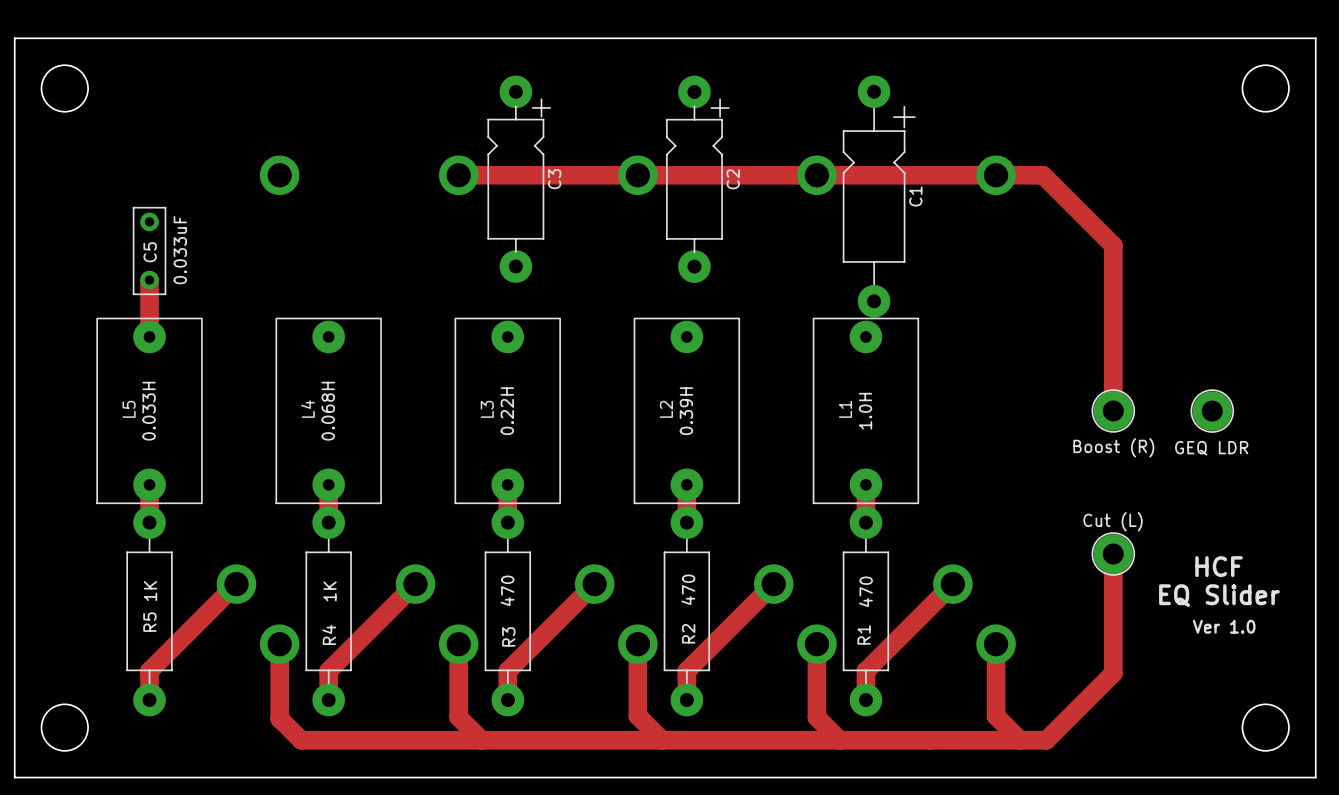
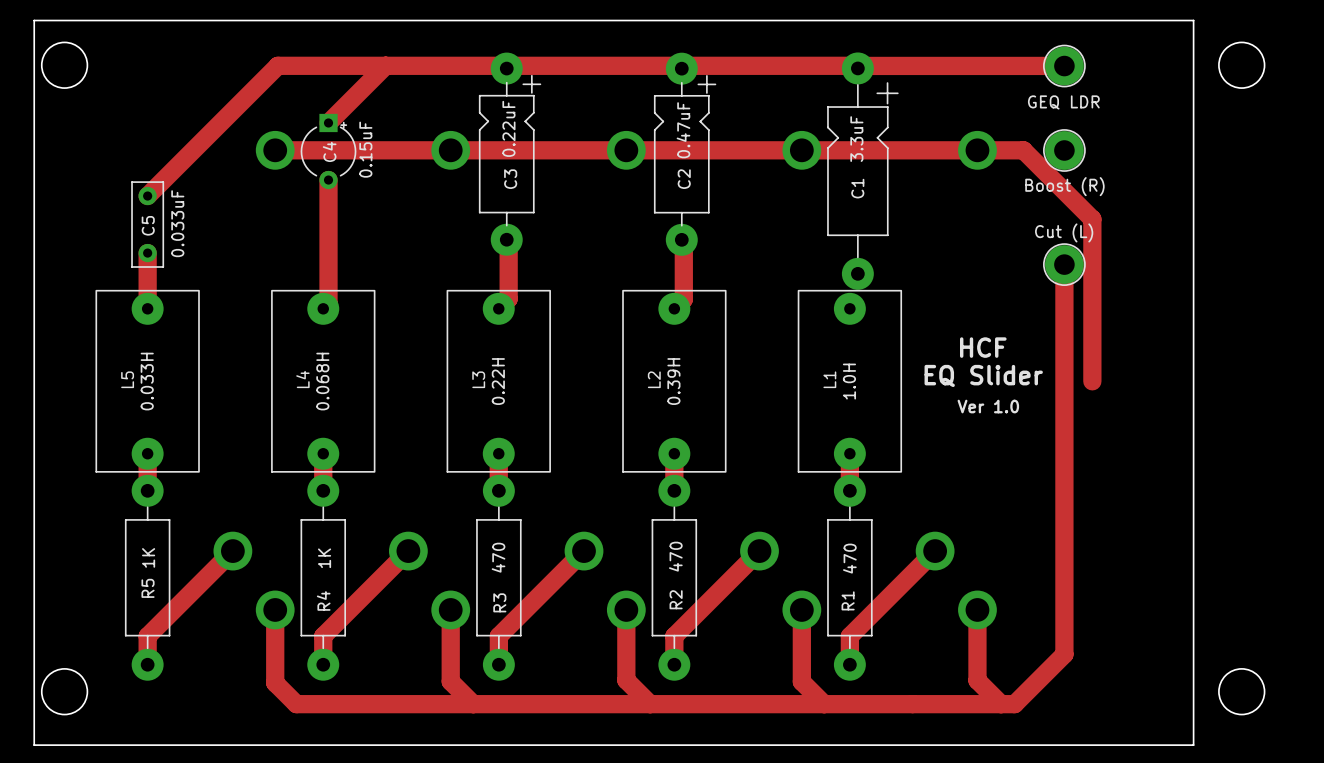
board edge: (14, 38) (1315, 38) (1315, 777) (14, 777) (14, 38) -> (34, 20) (34, 745) (1193, 745) (1193, 20) (34, 20)
top track: none -> (385, 65) (328, 122)
top track: none -> (856, 65) (277, 65) (147, 196)
top track: none -> (856, 65) (1064, 65)
part: none -> GEQ LDR (1064, 66)
C3 value: none -> 0.22uF (508, 128)
C2 value: none -> 0.47uF (683, 130)
C1 value: none -> 3.3uF (856, 139)
top track: none -> (275, 150) (450, 150)
C4: none -> 0.15uF (328, 151)
C3 name position: C3 (554, 179) -> C3 (510, 179)
C2 name position: C2 (733, 179) -> C2 (684, 179)
C1 name position: C1 (915, 196) -> C1 (857, 188)
top track: none -> (328, 180) (328, 303) (323, 308)
top track: none -> (508, 236) (508, 298) (498, 308)
top track: none -> (683, 236) (683, 299) (674, 308)
part position: (1113, 410) -> (1064, 150)
part: GEQ LDR (1212, 411) -> none
top track: (1113, 554) (1113, 673) (1046, 740) (1034, 740) -> (1064, 264) (1064, 654) (1014, 704)
part position: (1113, 554) -> (1064, 264)
text position: HCF (1219, 566) -> HCF (983, 347)
text position: EQ Slider (1219, 595) -> EQ Slider (983, 375)
text position: Ver 1.0 (1224, 626) -> Ver 1.0 (988, 406)

